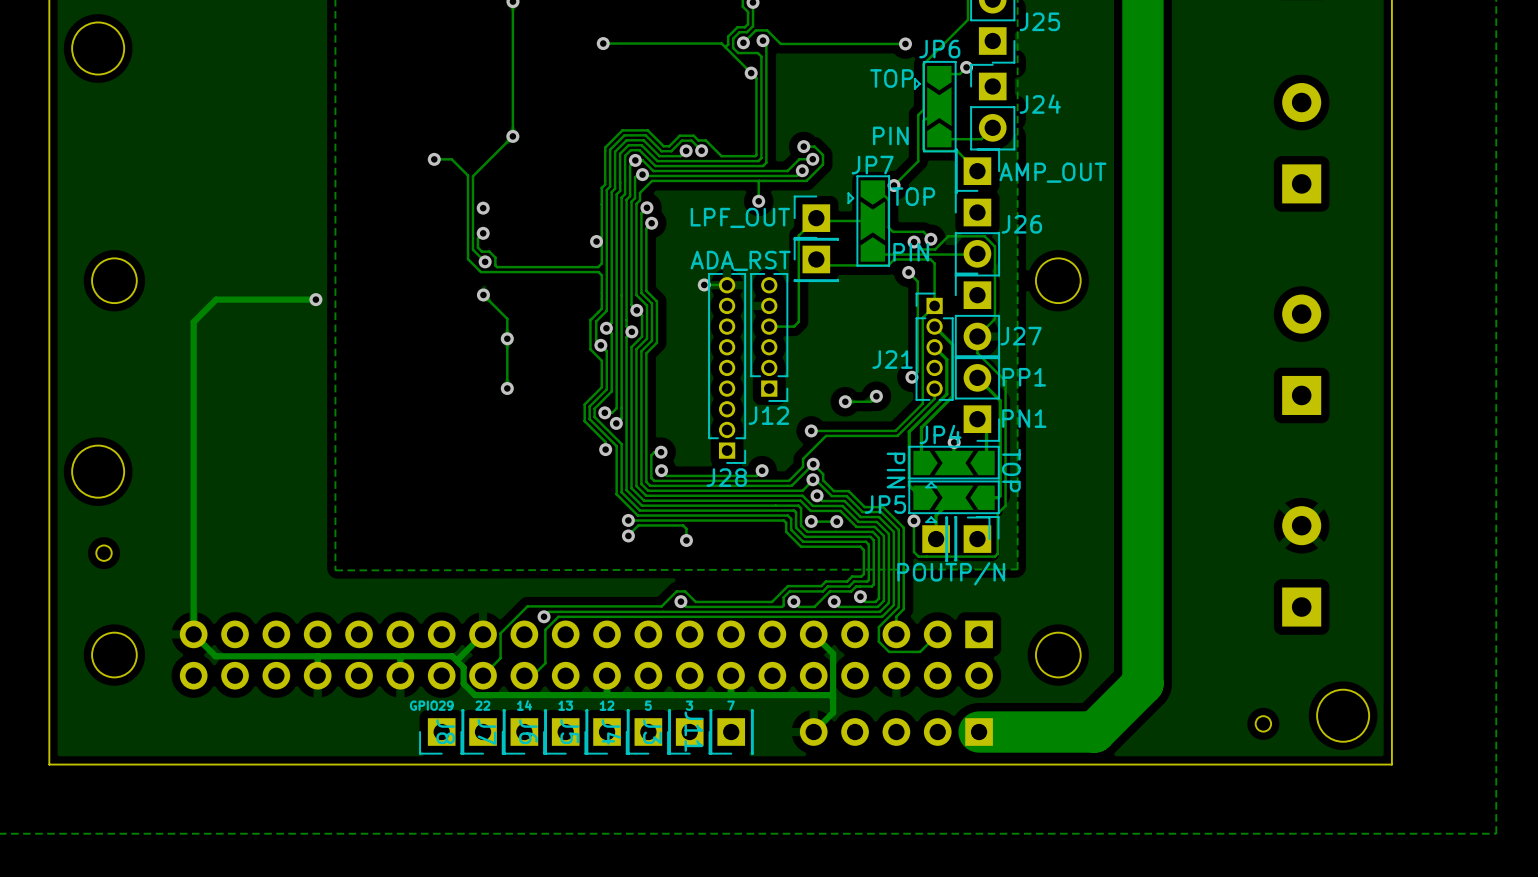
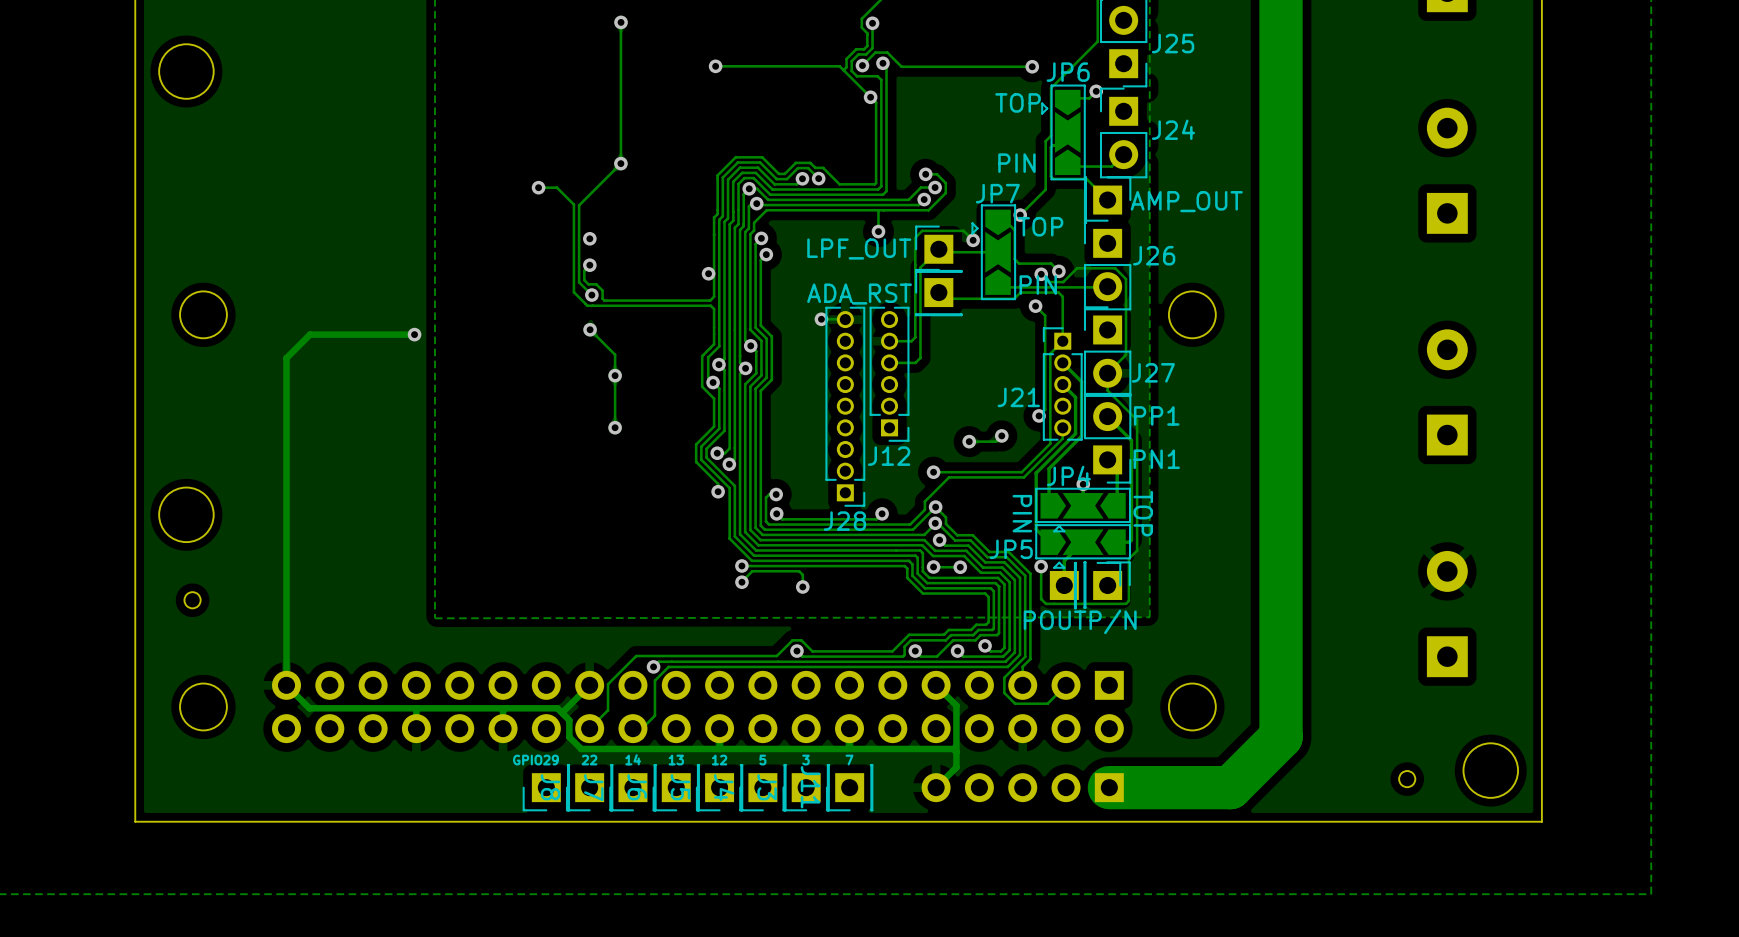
track: none -> (973, 240) (963, 230) (922, 230) (915, 237) (915, 337) (911, 341) (889, 341)
via: none -> (973, 240)

